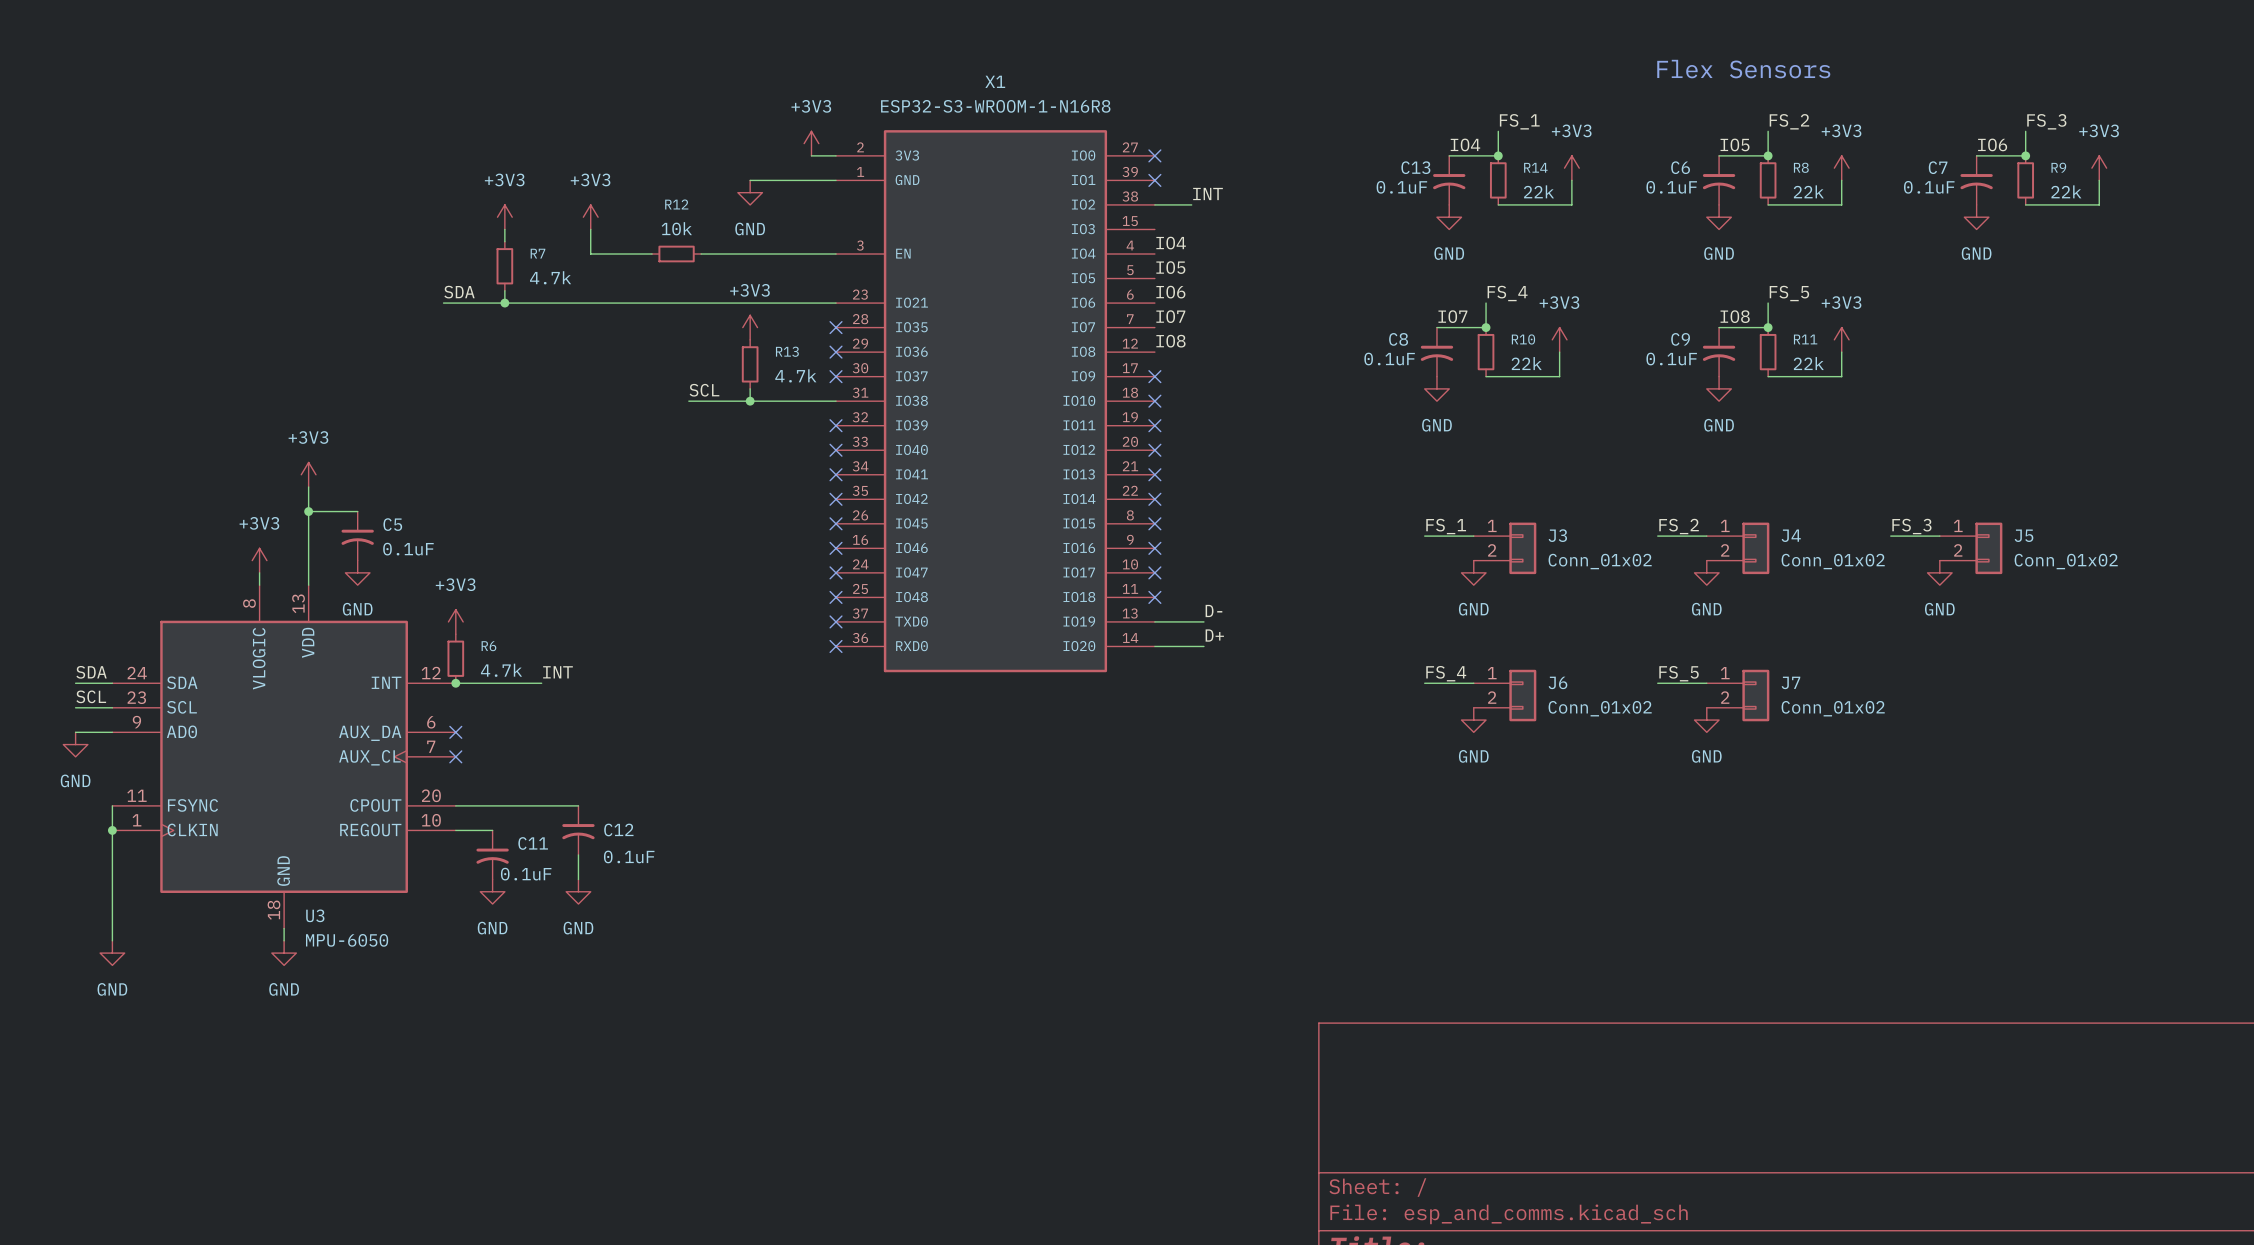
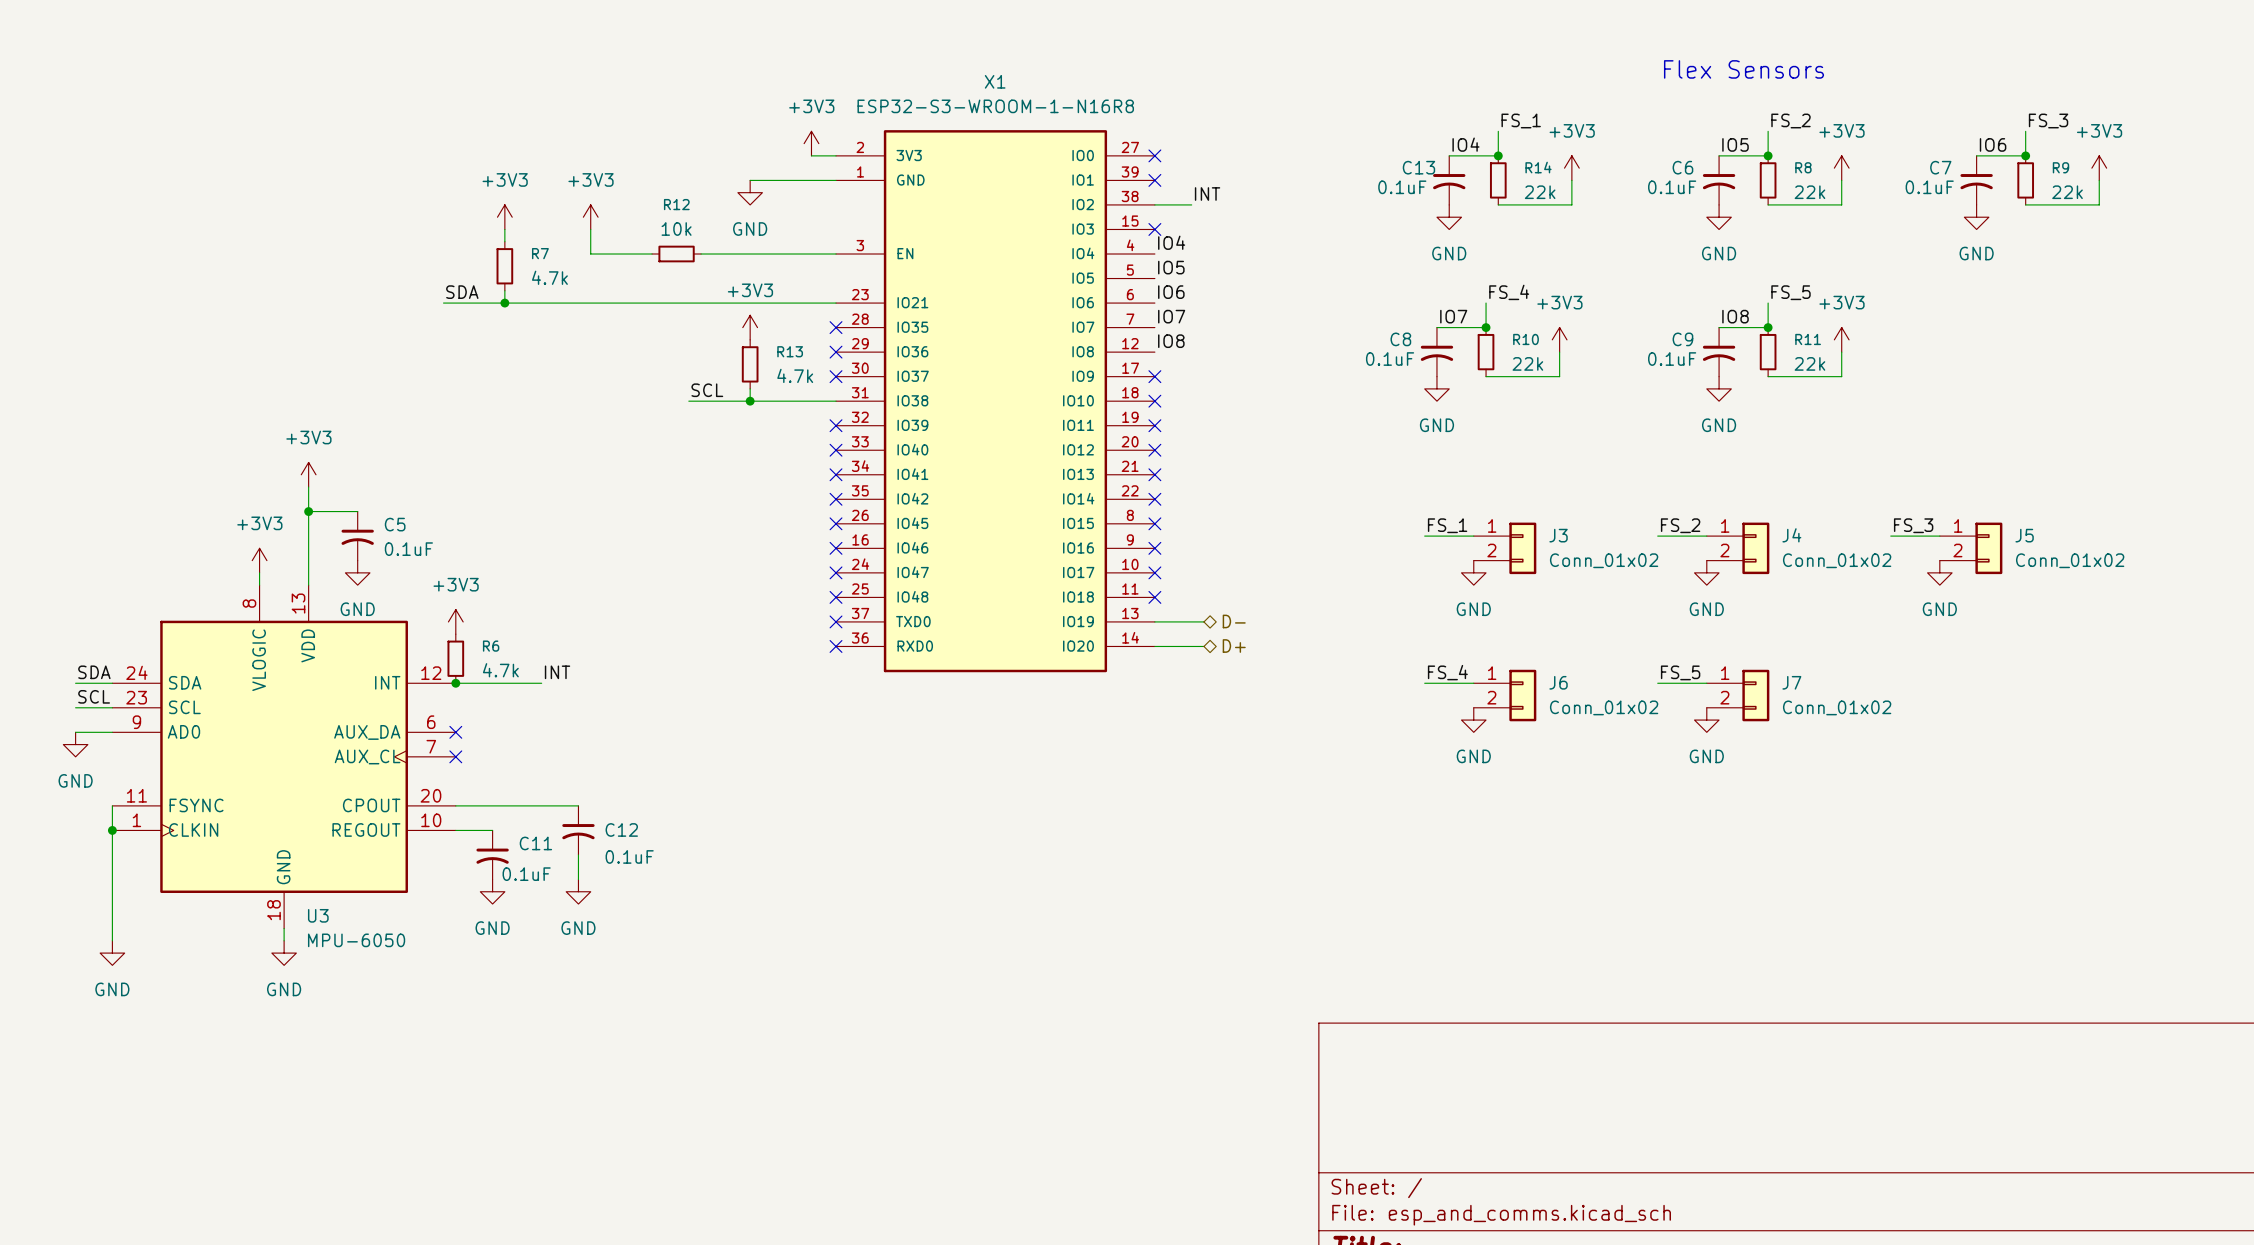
no-connect mark: none -> (1154, 229)
label: D- (1213, 610) -> none
hierarchical label: none -> D- (1234, 621)
label: D+ (1214, 635) -> none
hierarchical label: none -> D+ (1234, 646)

